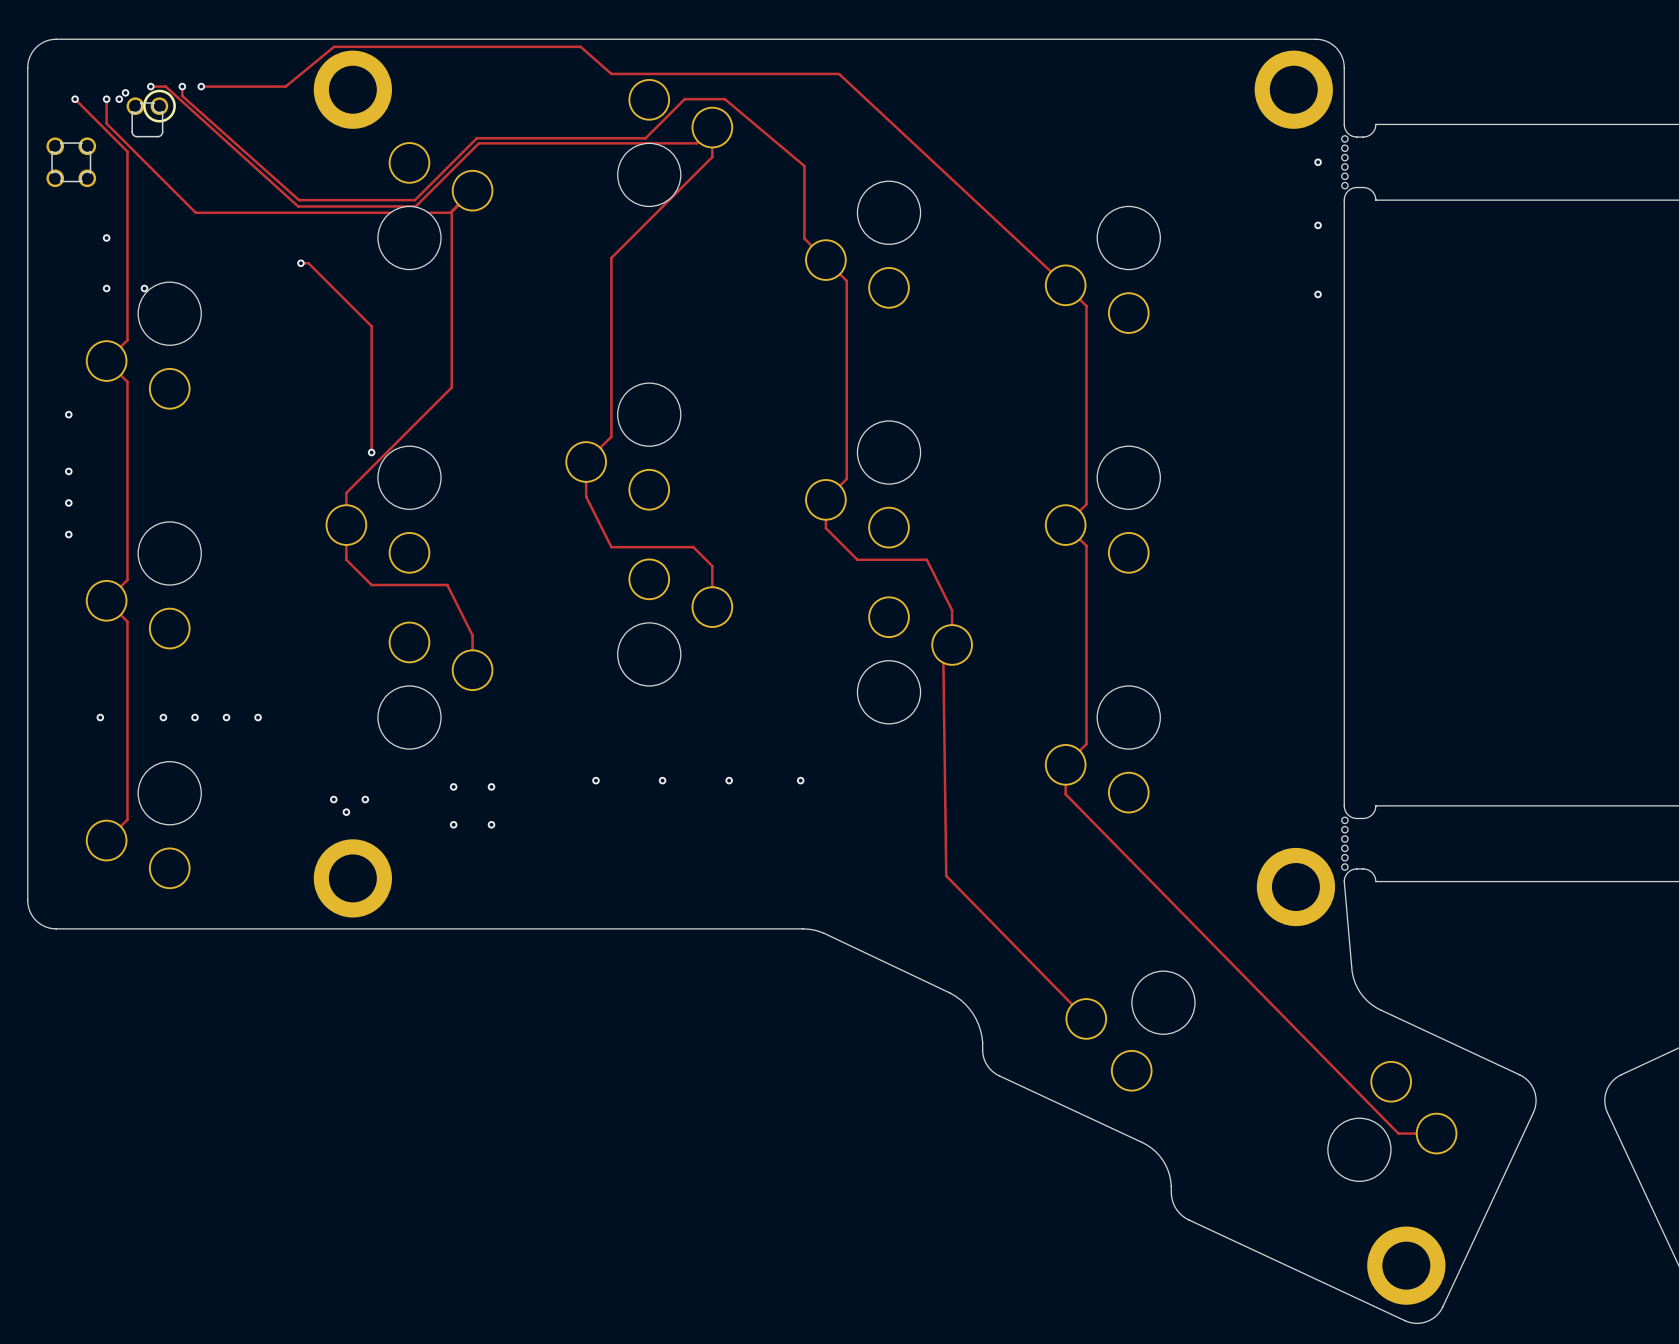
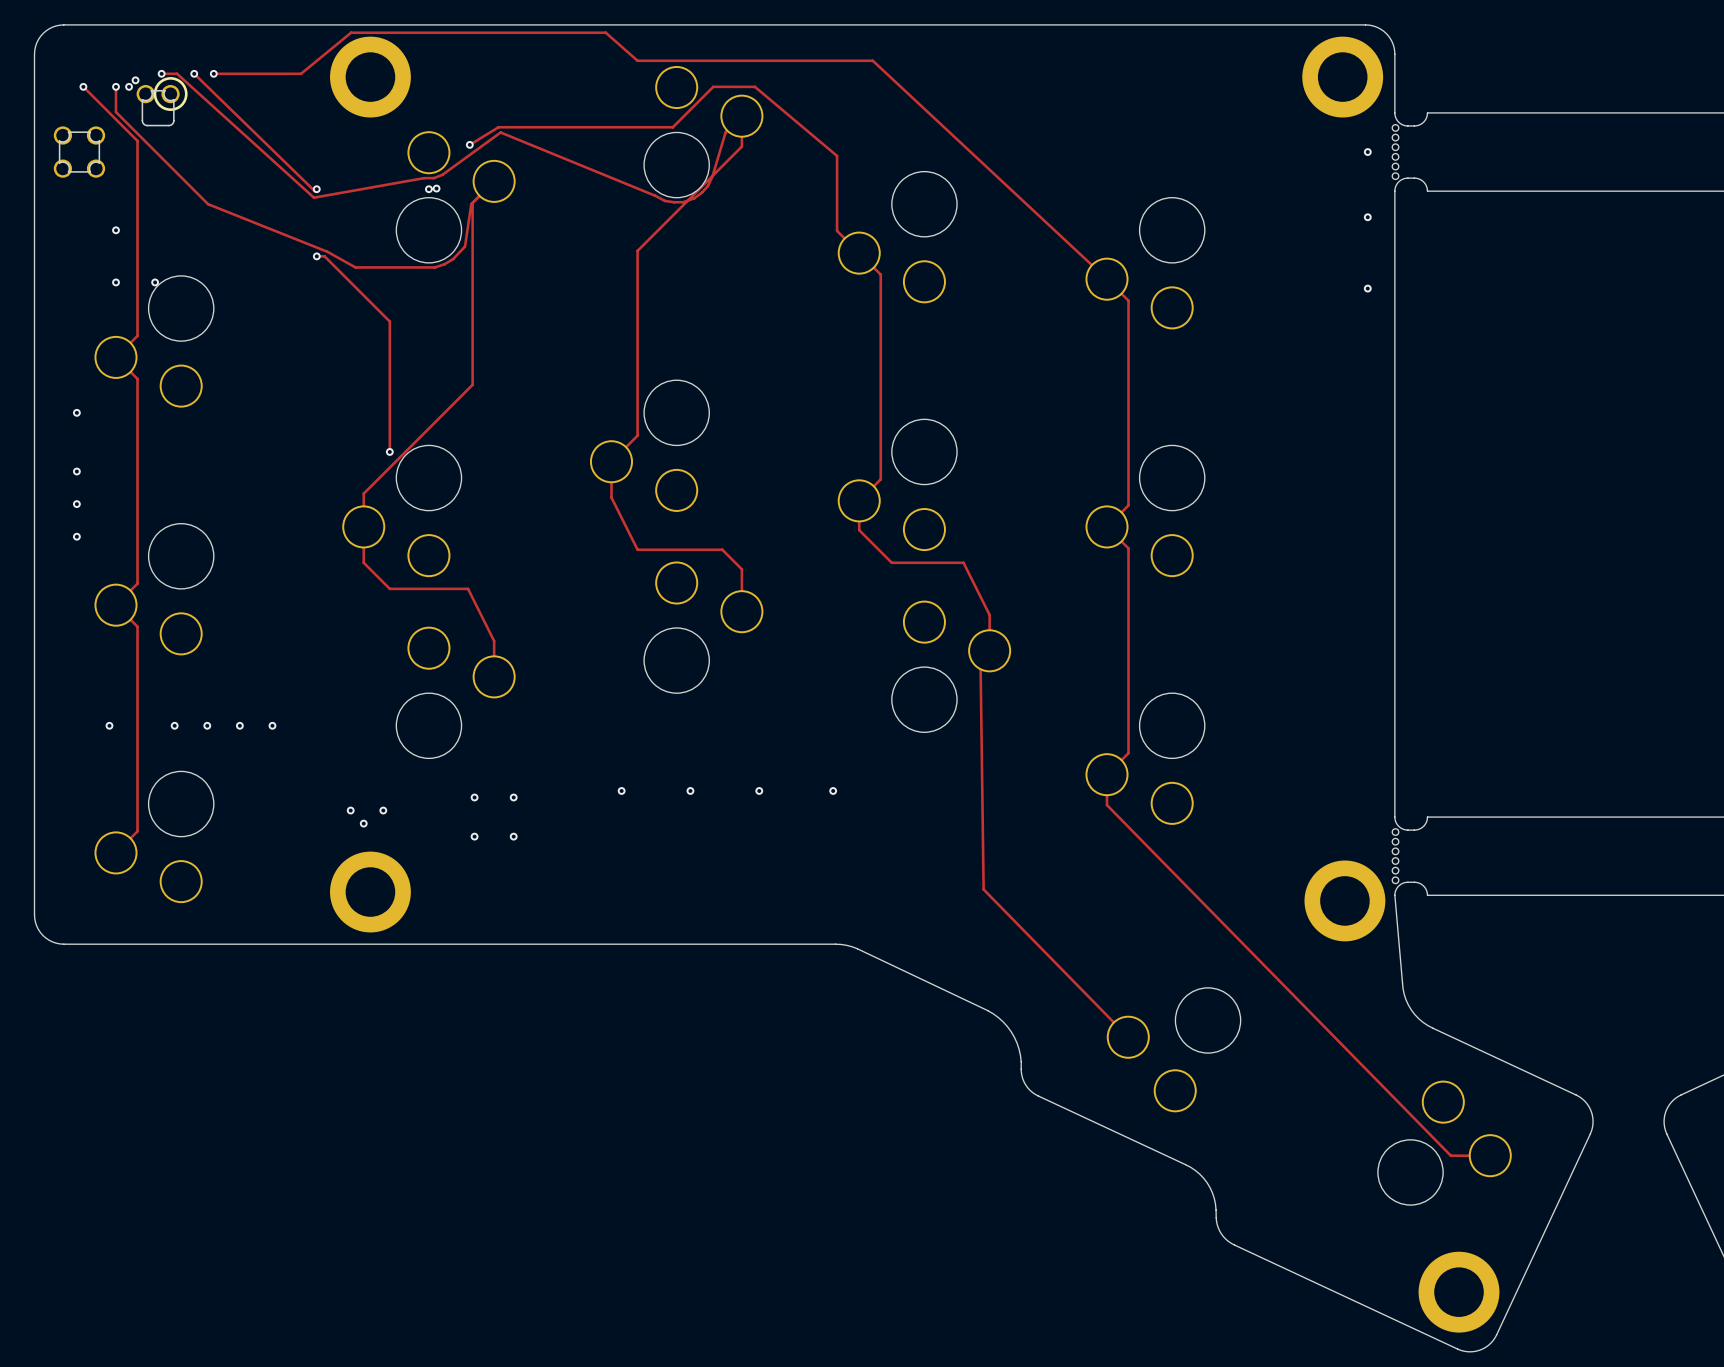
track: (182, 86) (182, 96) (299, 200) (414, 200) (476, 138) -> (194, 73) (314, 191) (316, 189)
track: none -> (498, 127) (469, 144)
track: (696, 143) (478, 143) (415, 206) (298, 206) -> (725, 132) (707, 185) (694, 198) (683, 202) (664, 200) (500, 132) (442, 174) (433, 178) (424, 178) (313, 197)
via: none -> (469, 144)
via: none -> (436, 188)
via: none -> (316, 189)
via: none -> (428, 189)
track: (195, 212) (450, 212) -> (208, 204) (327, 251) (355, 267) (435, 267) (444, 264) (453, 258) (465, 246) (471, 204)

